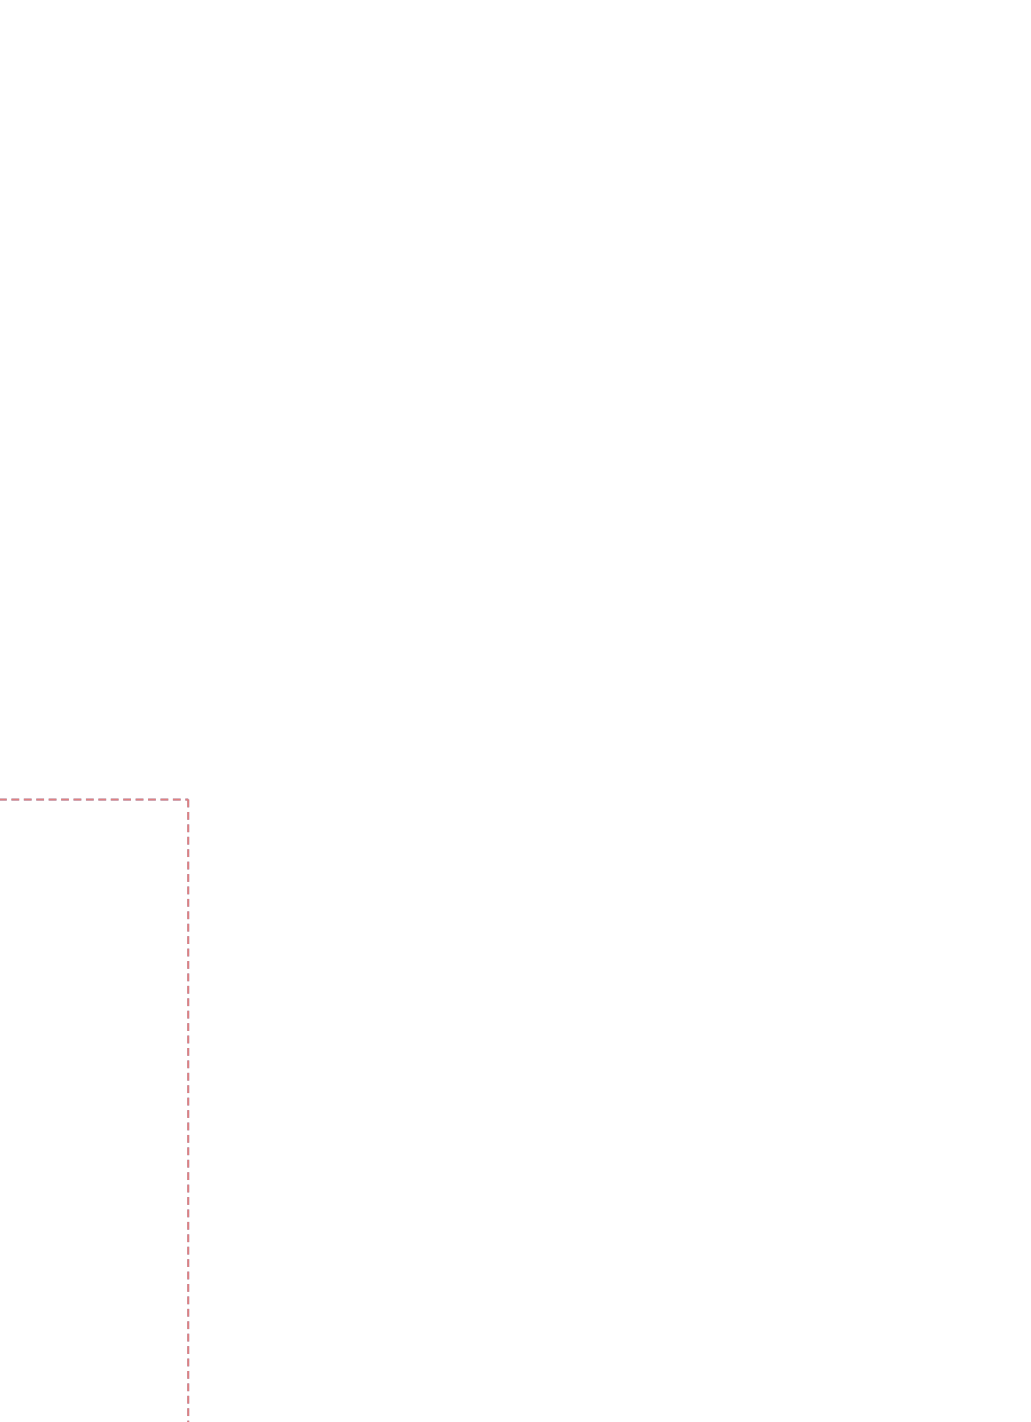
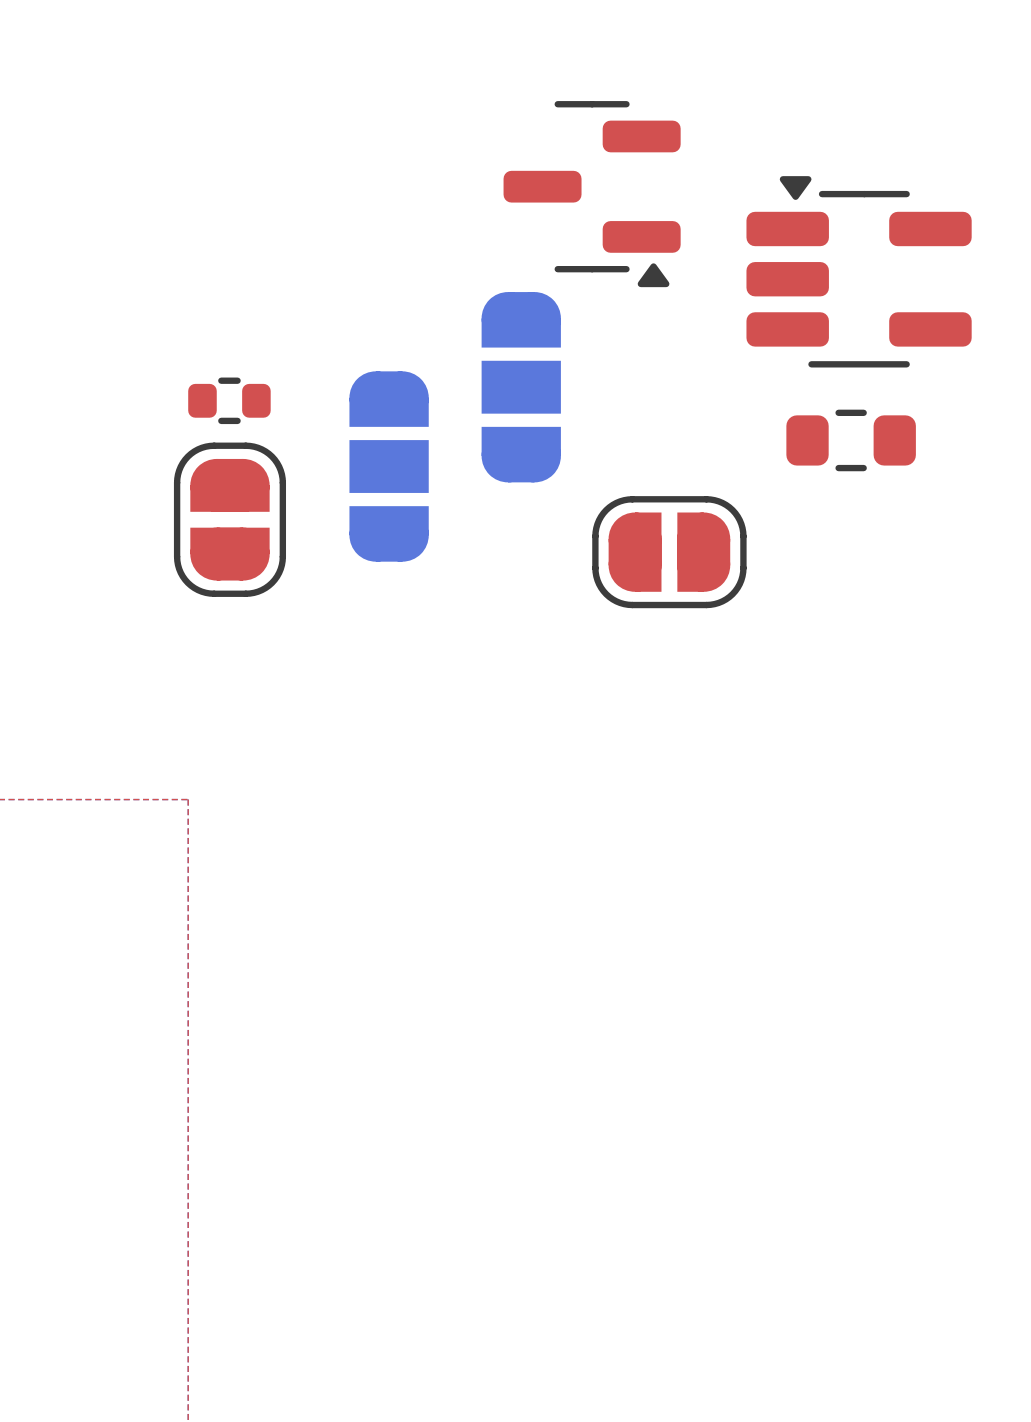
part: none -> (592, 194)
part: none -> (859, 271)
part: none -> (521, 387)
part: none -> (229, 400)
part: none -> (851, 440)
part: none -> (389, 466)
part: none -> (229, 519)
part: none -> (669, 552)

